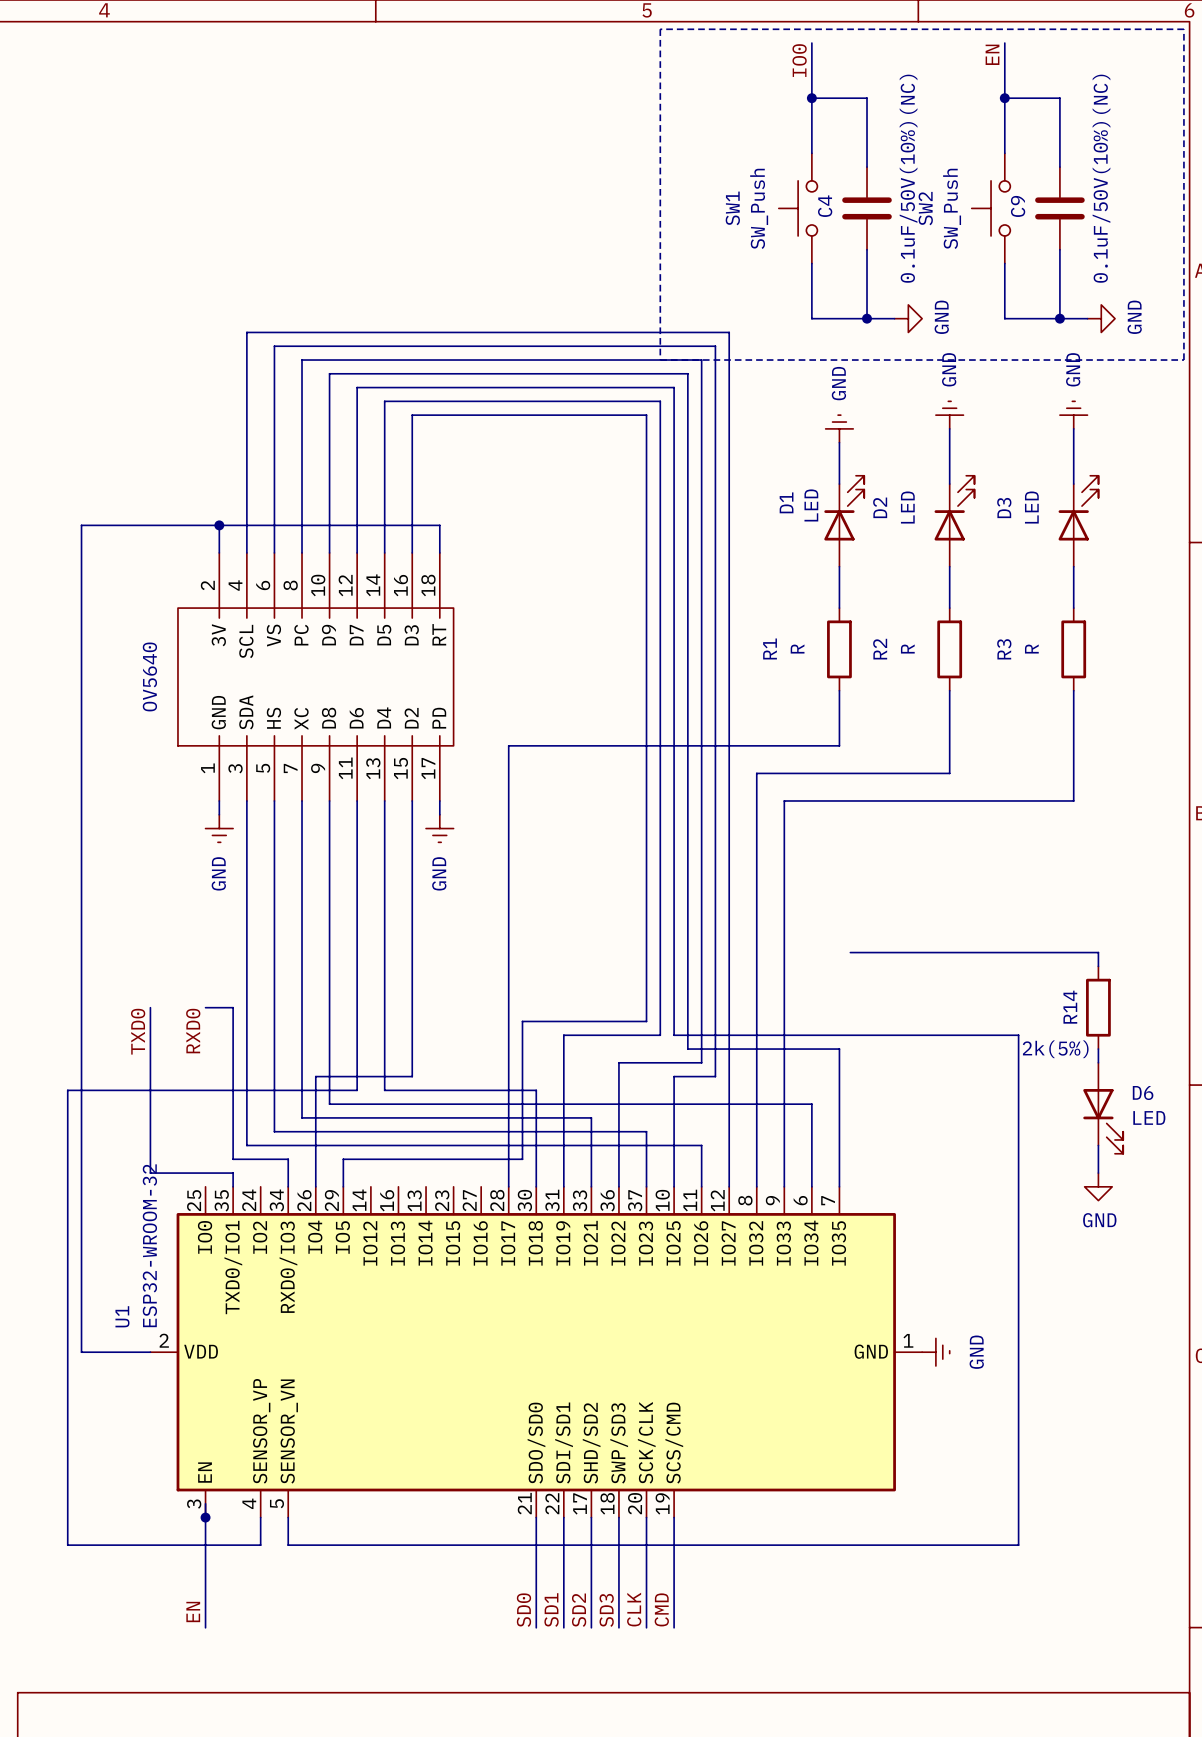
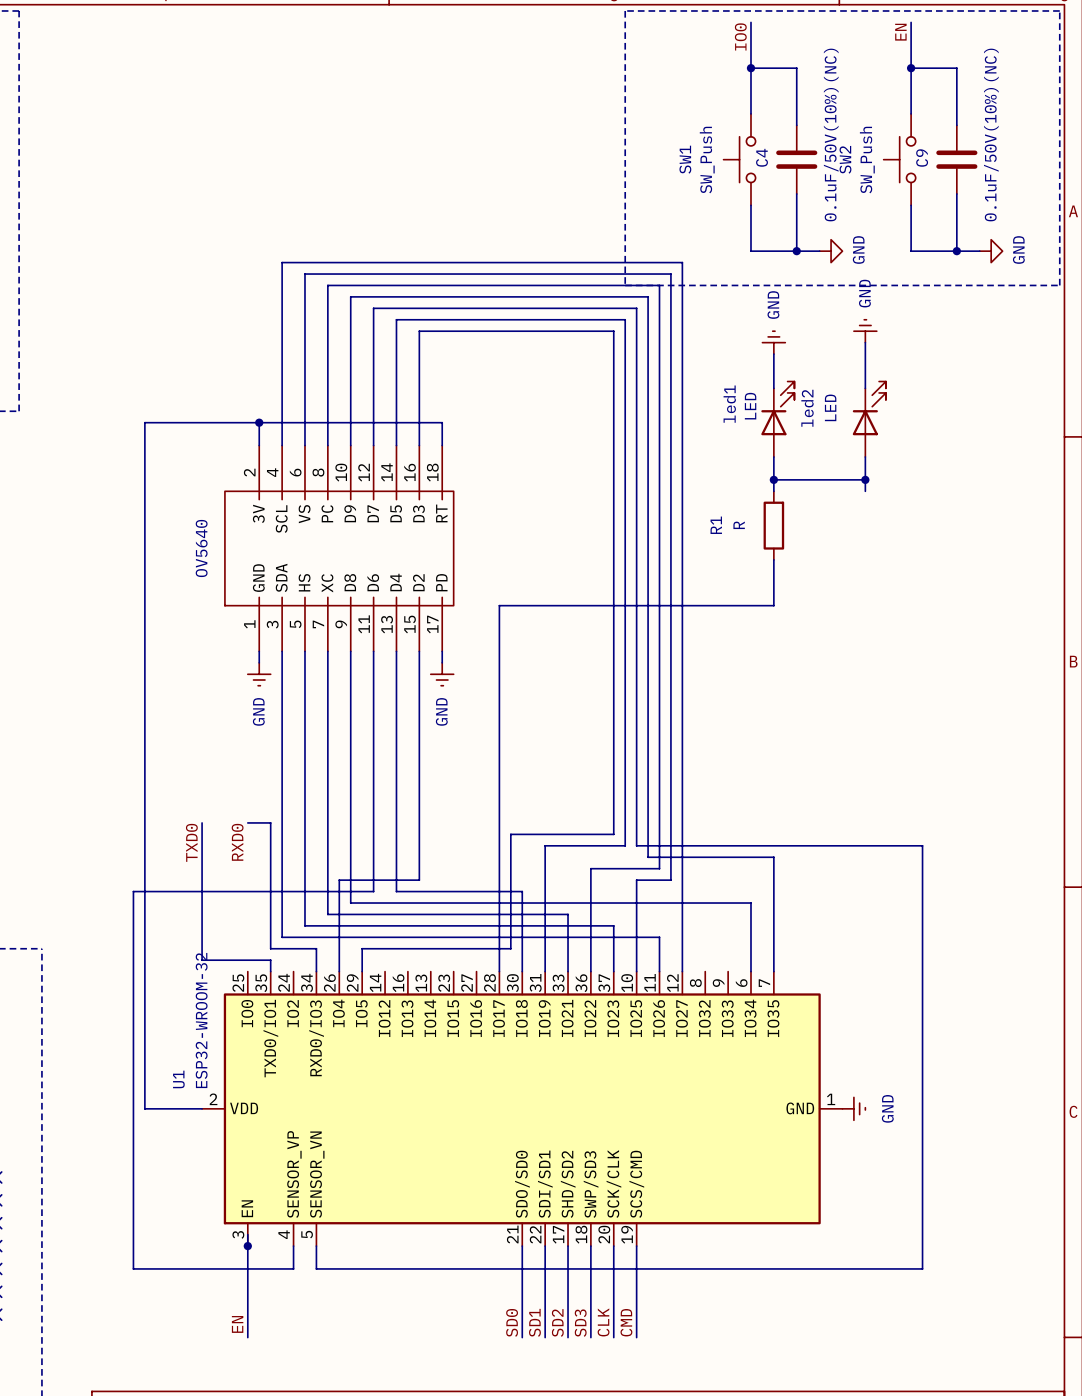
power symbol: GND (1073, 415) -> none
wire: (1073, 428) (1073, 484) -> none
D1 name: D1 (786, 502) -> led1 (729, 404)
D2 name: D2 (880, 507) -> led2 (807, 408)
D3: LED (1078, 521) -> none
wire: (1073, 566) (1073, 608) -> none
wire: none -> (773, 479) (865, 479)
junction: none -> (773, 479)
junction: none -> (865, 479)
R2: R (949, 649) -> none
R3: R (1073, 649) -> none
wire: (949, 690) (949, 773) (756, 773) (756, 1186) -> none
wire: (1073, 690) (1073, 800) (784, 800) (784, 1186) -> none
wire: (850, 952) (1098, 952) (1098, 966) -> none
R14: 2k(5%) (1098, 1007) -> none
wire: (1098, 1049) (1098, 1062) -> none
D6: LED (1103, 1108) -> none
wire: (1098, 1145) (1098, 1173) -> none
power symbol: GND (1098, 1186) -> none

